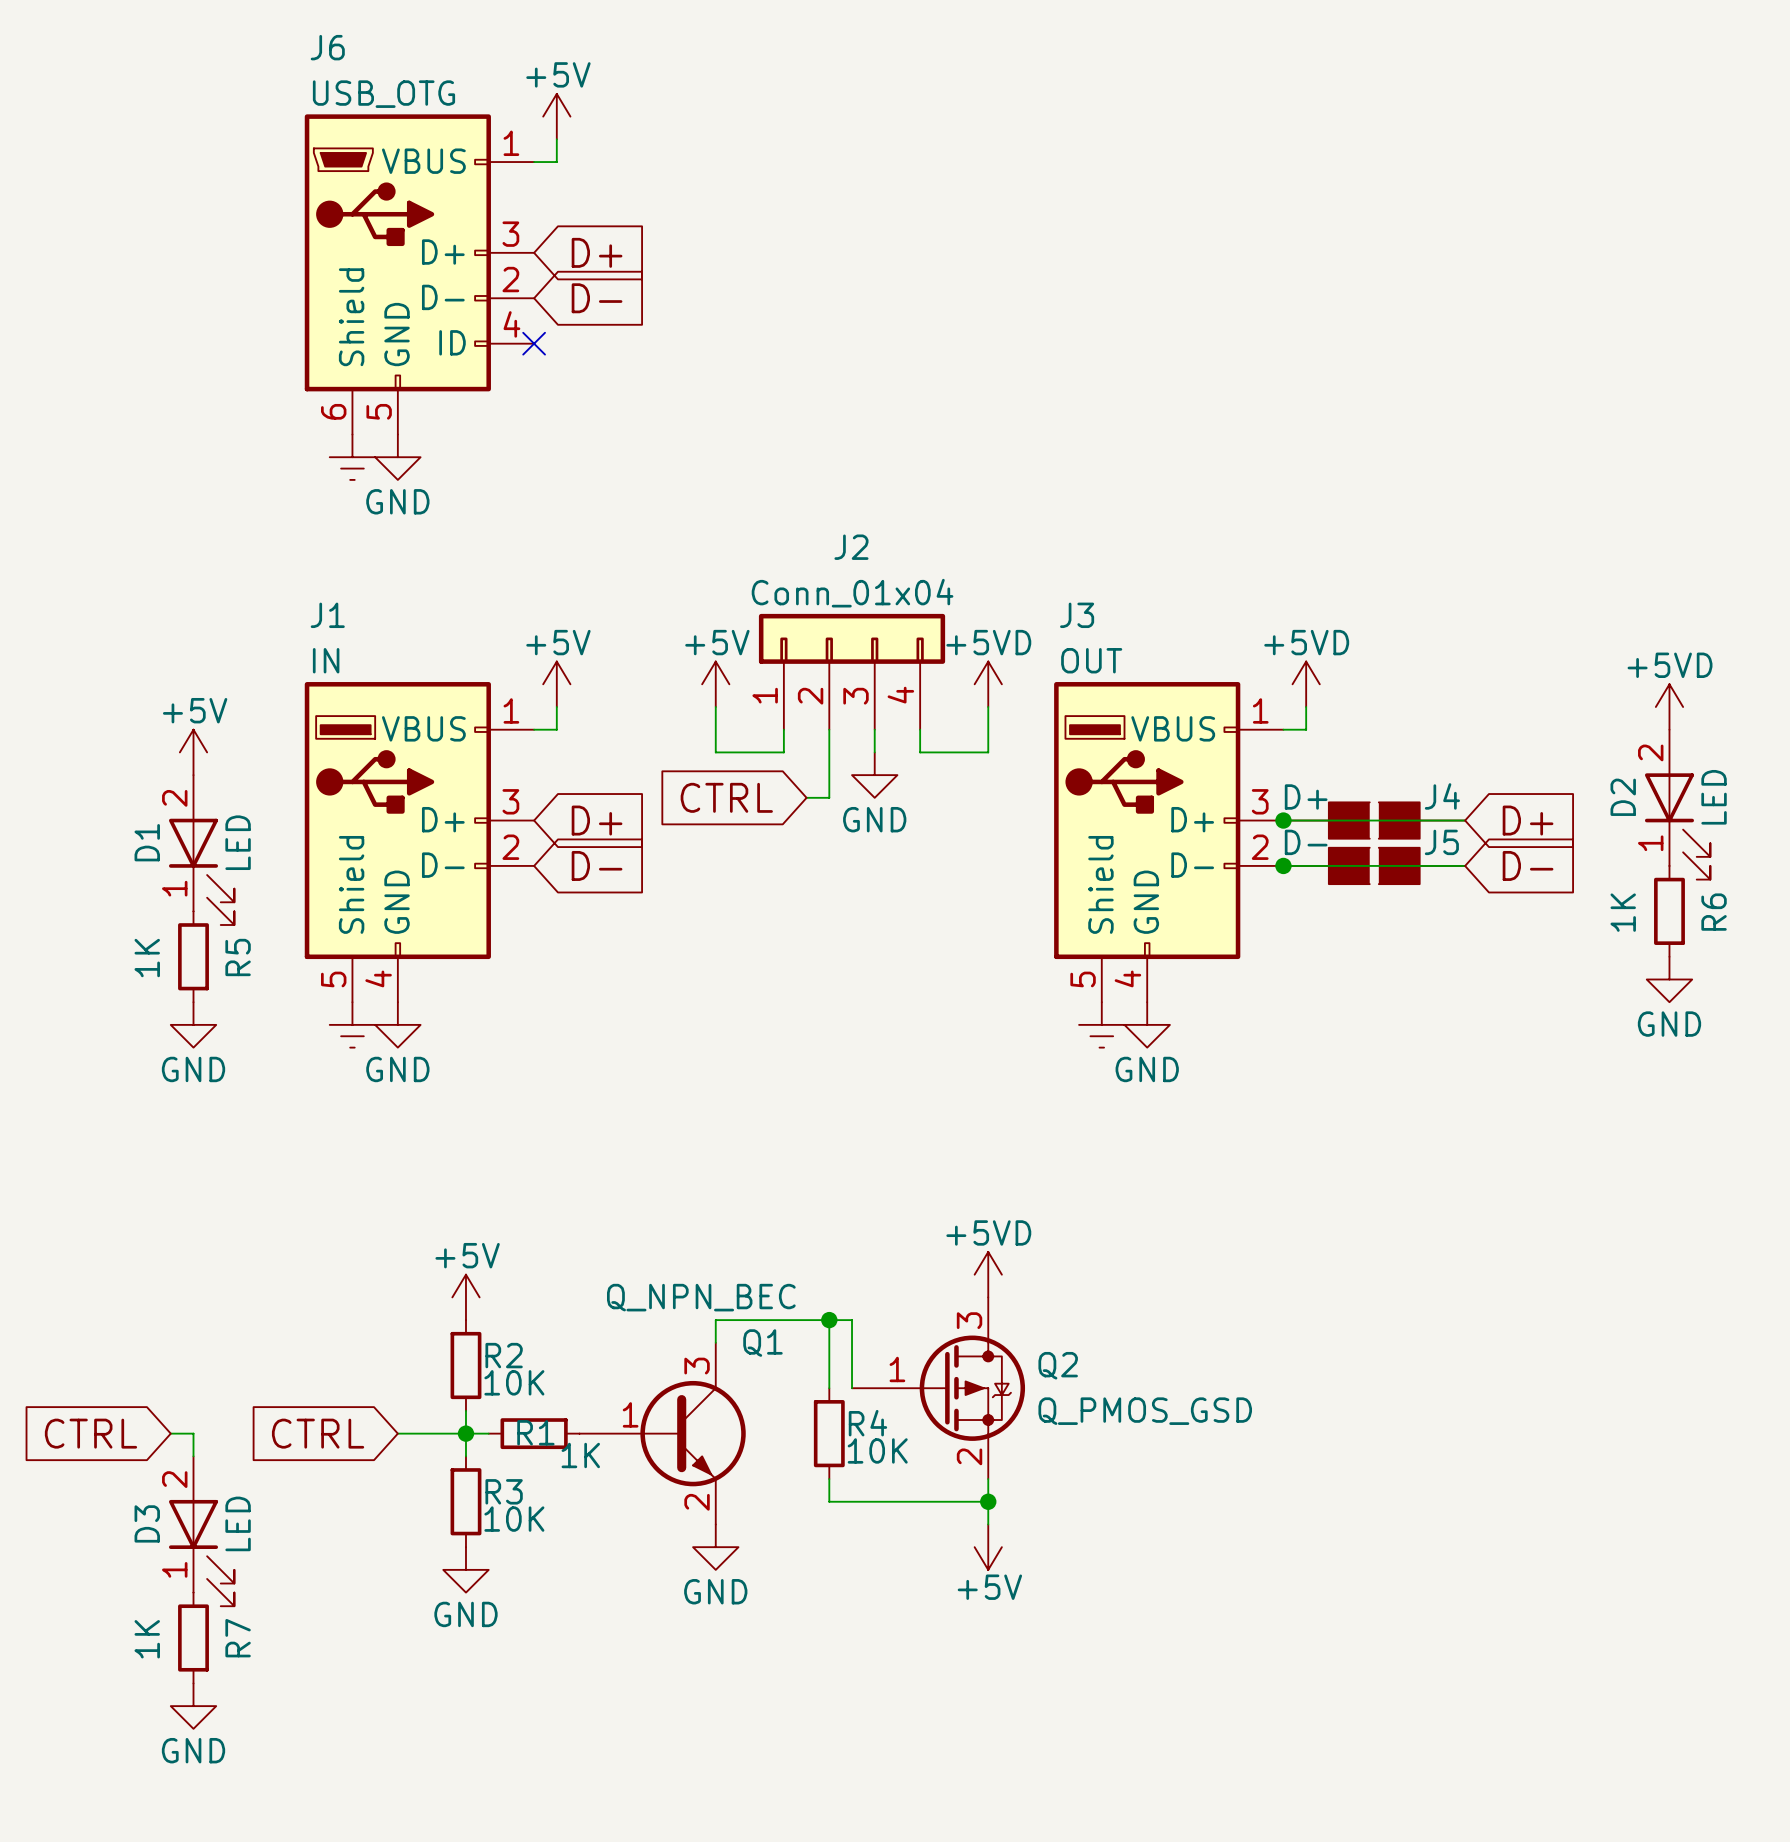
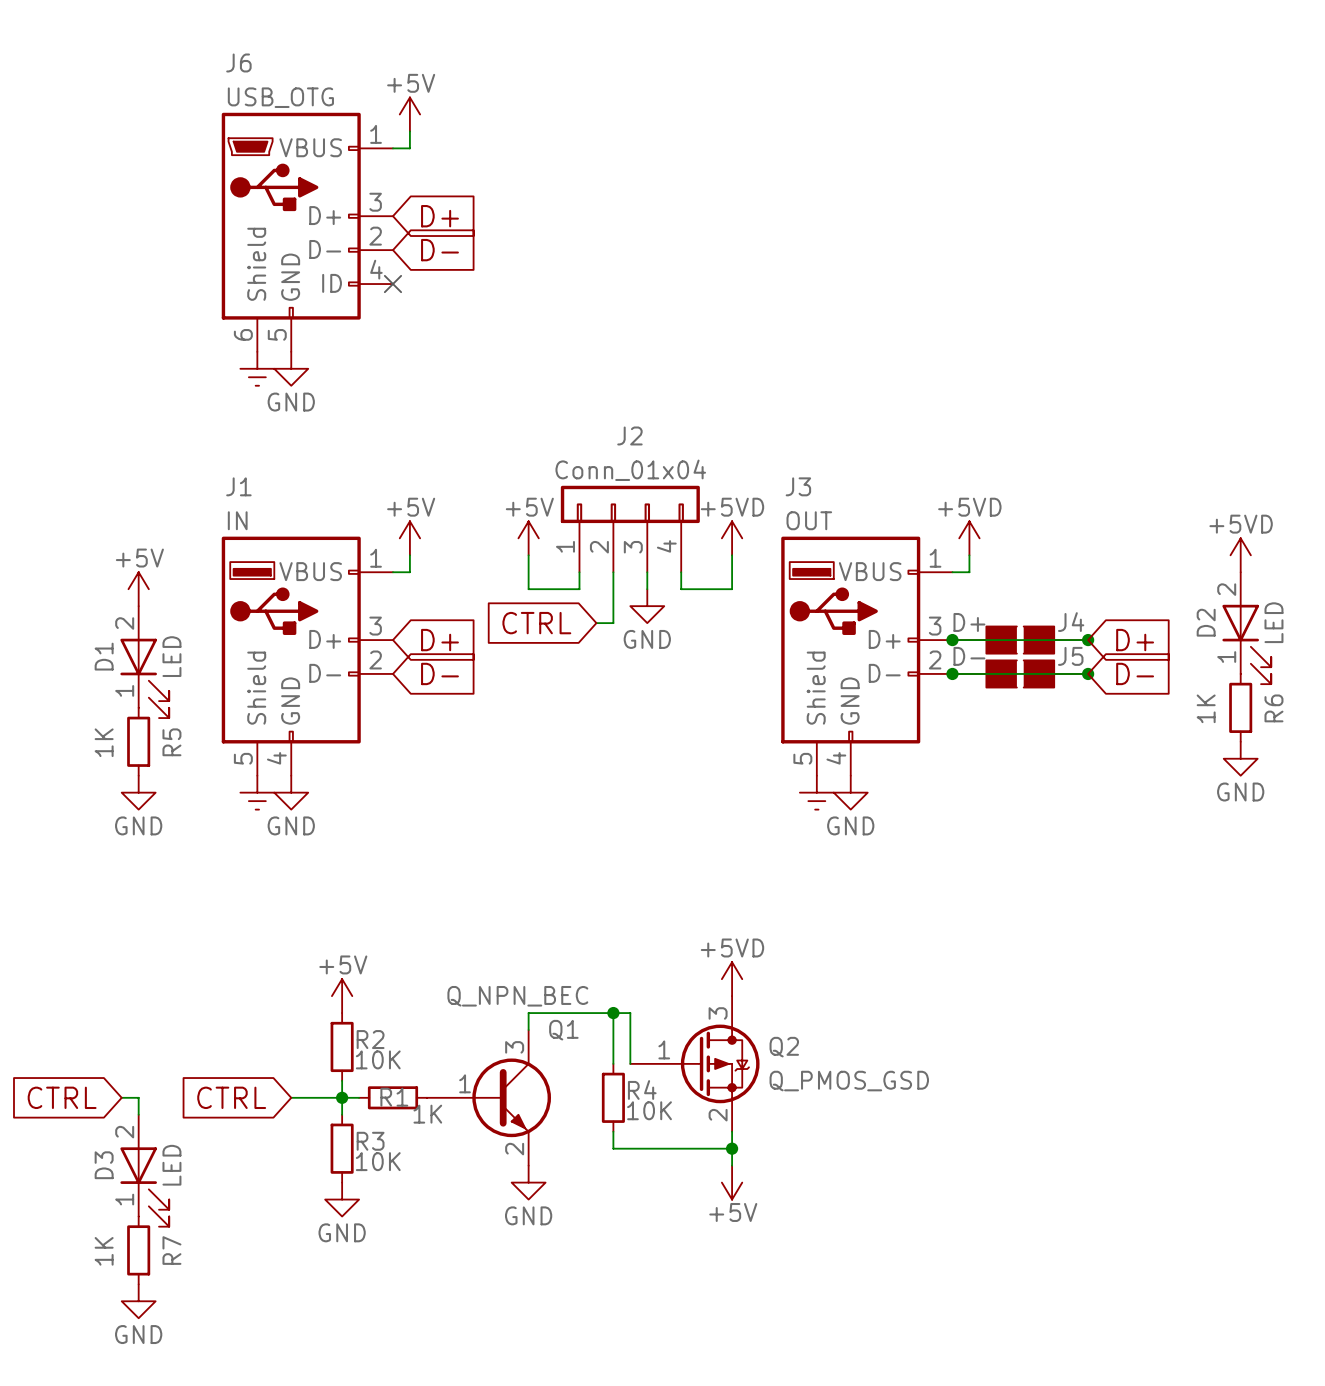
junction: none -> (1088, 640)
junction: none -> (1088, 673)

